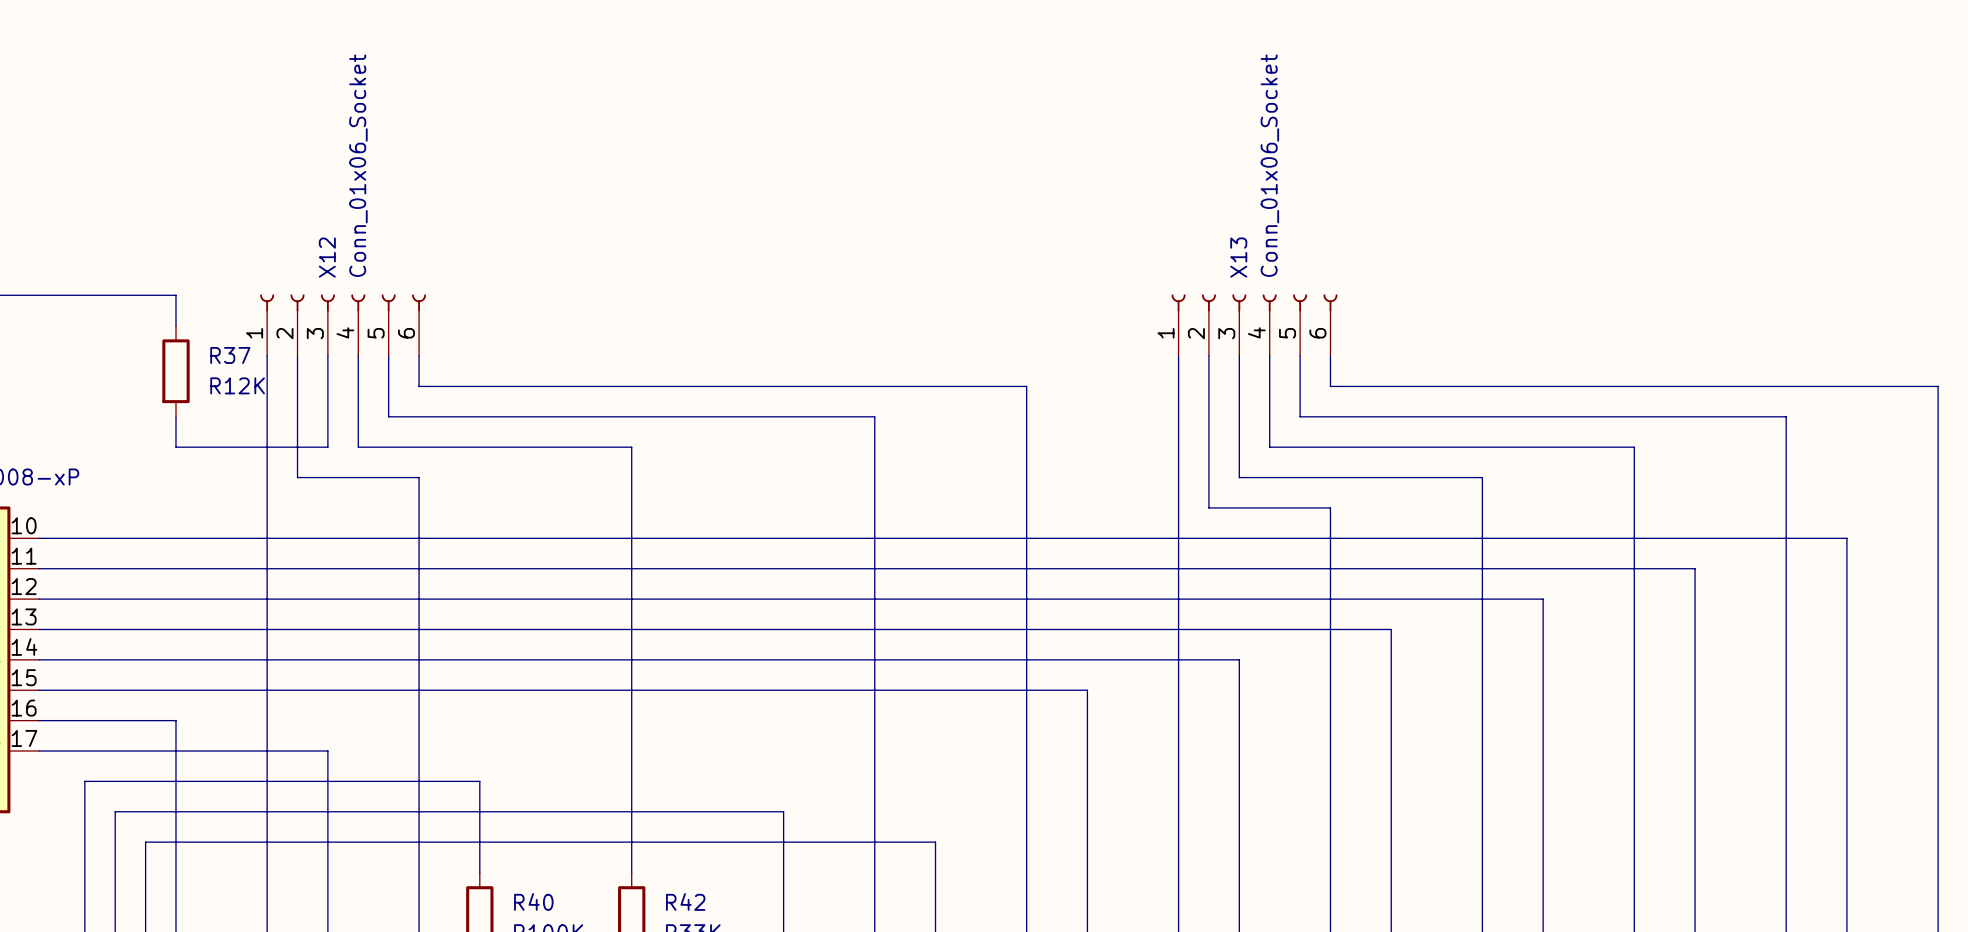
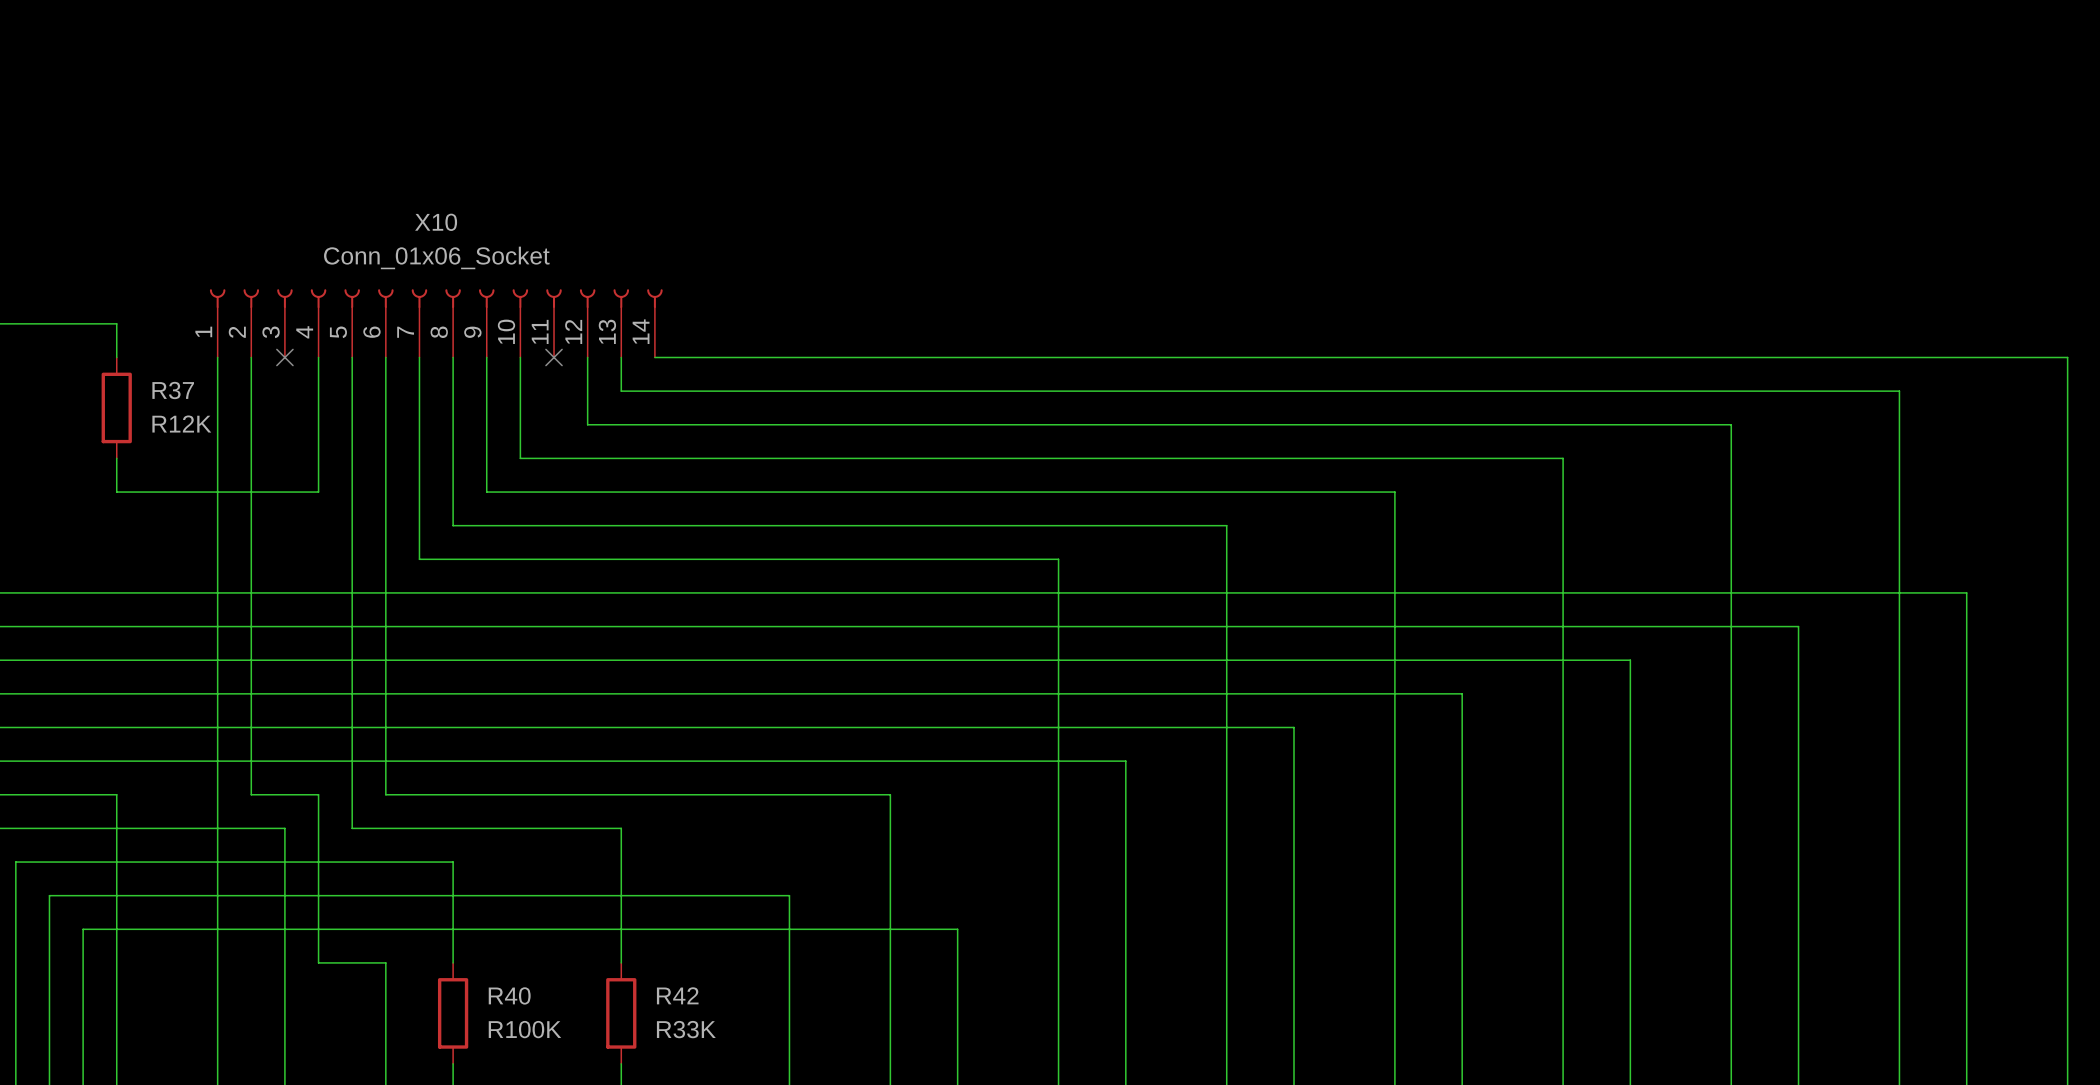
X10: none -> Conn_01x06_Socket (436, 323)
no-connect mark: none -> (284, 357)
X12: Conn_01x06_Socket (343, 325) -> none
no-connect mark: none -> (554, 357)
wire: none -> (654, 357) (2067, 357) (2067, 424)
X13: Conn_01x06_Socket (1254, 325) -> none
wire: (327, 356) (327, 447) -> (318, 492) (284, 492)
wire: (1178, 356) (1178, 477) -> (453, 357) (453, 525) (1226, 525)
wire: (1208, 356) (1208, 507) (1330, 507) -> (1394, 492) (1394, 559)
wire: (1239, 356) (1239, 477) (1482, 477) -> (1563, 458) (1563, 525)
wire: (1269, 356) (1269, 447) -> (621, 492) (1327, 492)
wire: (1300, 356) (1300, 416) -> (890, 458) (1361, 458)
wire: (1330, 356) (1330, 386) -> (1058, 424) (1394, 424)
wire: (419, 386) (601, 386) -> (587, 357) (587, 424)
wire: (1026, 386) (1026, 507) -> (419, 357) (419, 559) (1058, 559)
wire: (1634, 386) (1938, 386) -> (1731, 424) (1731, 492)
wire: (388, 416) (540, 416) -> (520, 357) (520, 458)
wire: (874, 416) (874, 720) -> (385, 794) (890, 794)
wire: (1482, 416) (1786, 416) -> (621, 357) (621, 391) (1899, 391) (1899, 458)
wire: (358, 447) (510, 447) -> (486, 357) (486, 492)
wire: (631, 447) (631, 751) -> (352, 458) (352, 828) (621, 828)
wire: (1330, 447) (1634, 447) -> none
wire: (297, 477) (419, 477) -> (385, 424) (385, 525)
wire: (419, 720) (419, 872) -> (251, 525) (251, 794) (318, 794) (318, 962) (385, 962)

